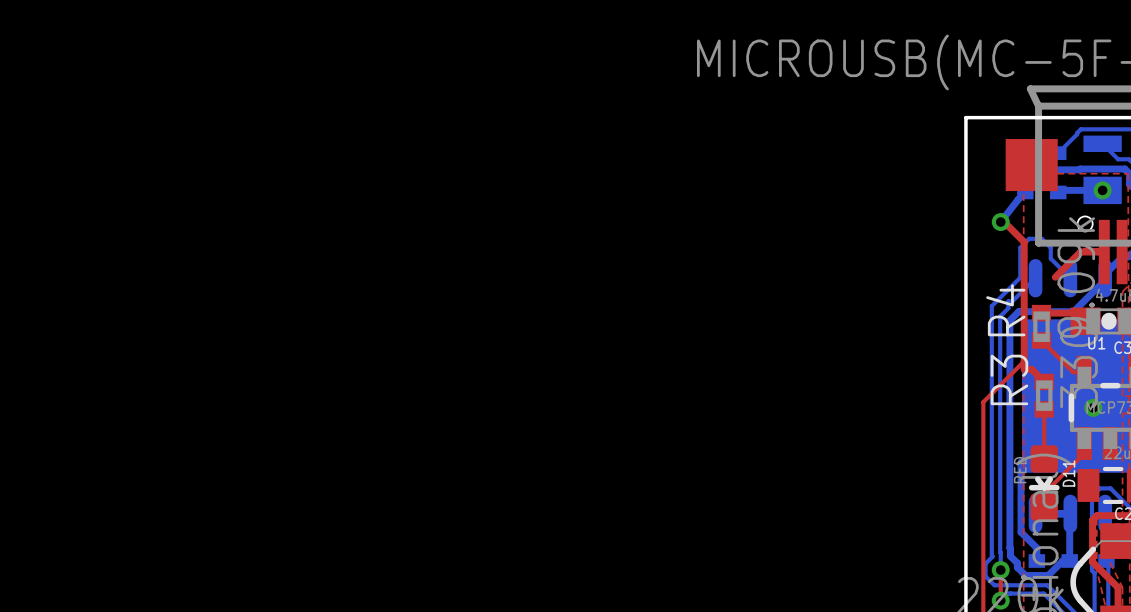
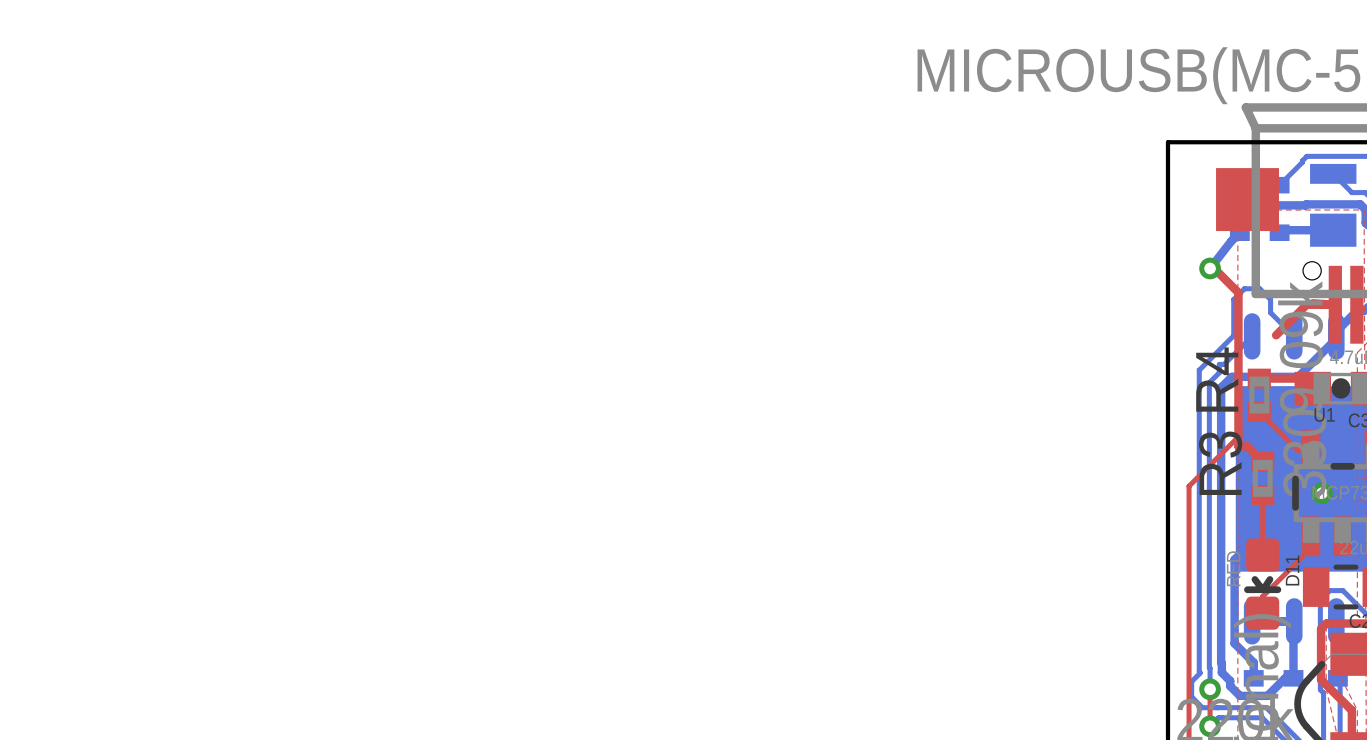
via: (1102, 190) -> none

